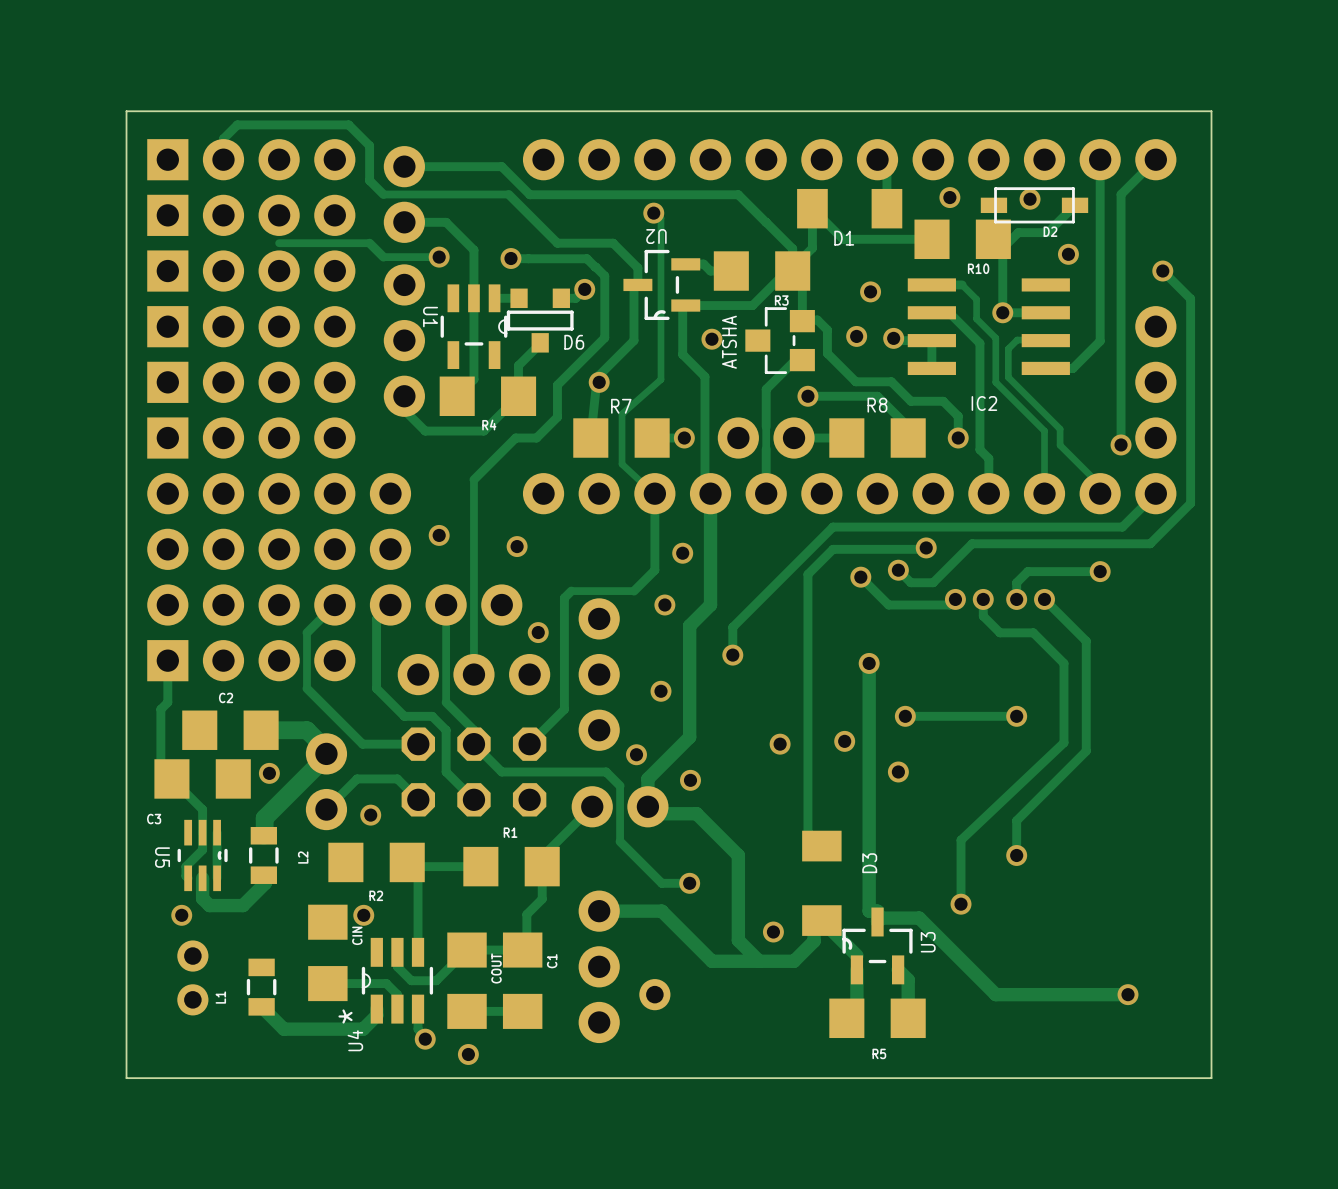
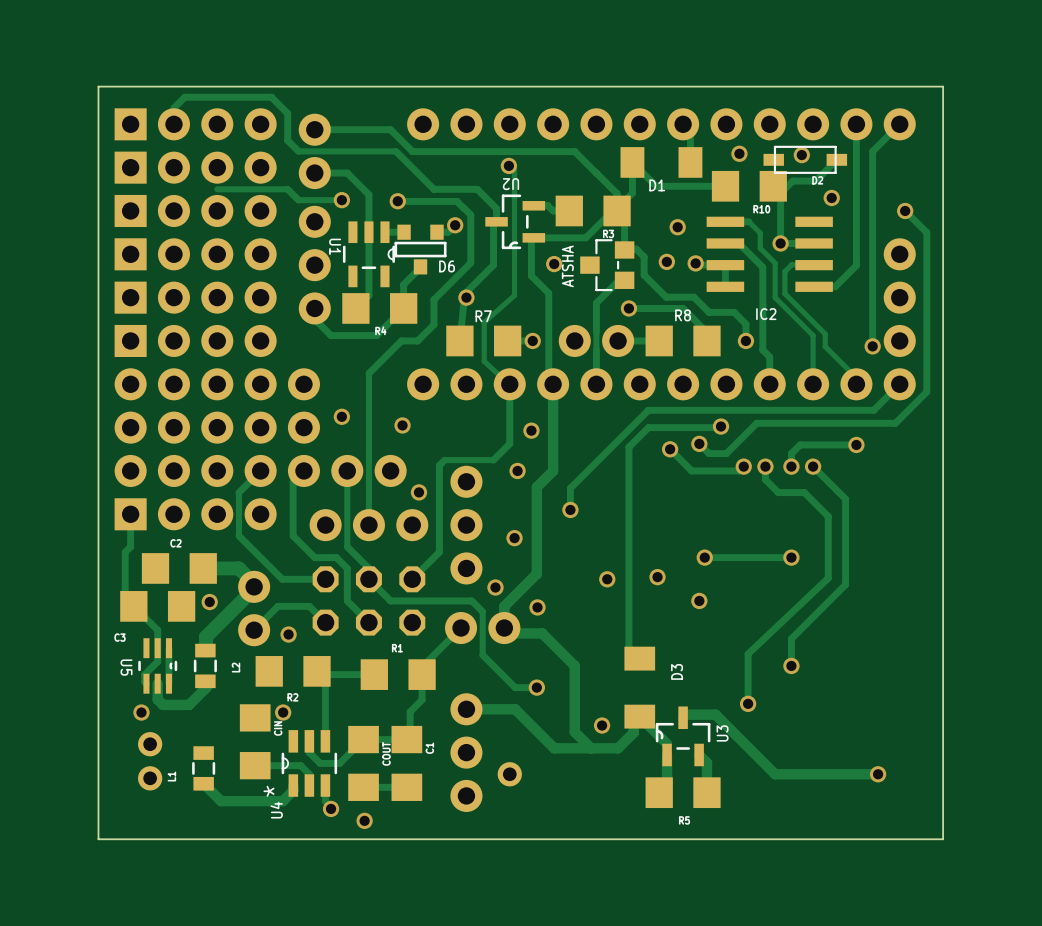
track: (869, 663) (869, 911) (877, 911) (877, 922) -> none
via: (869, 663) -> none

